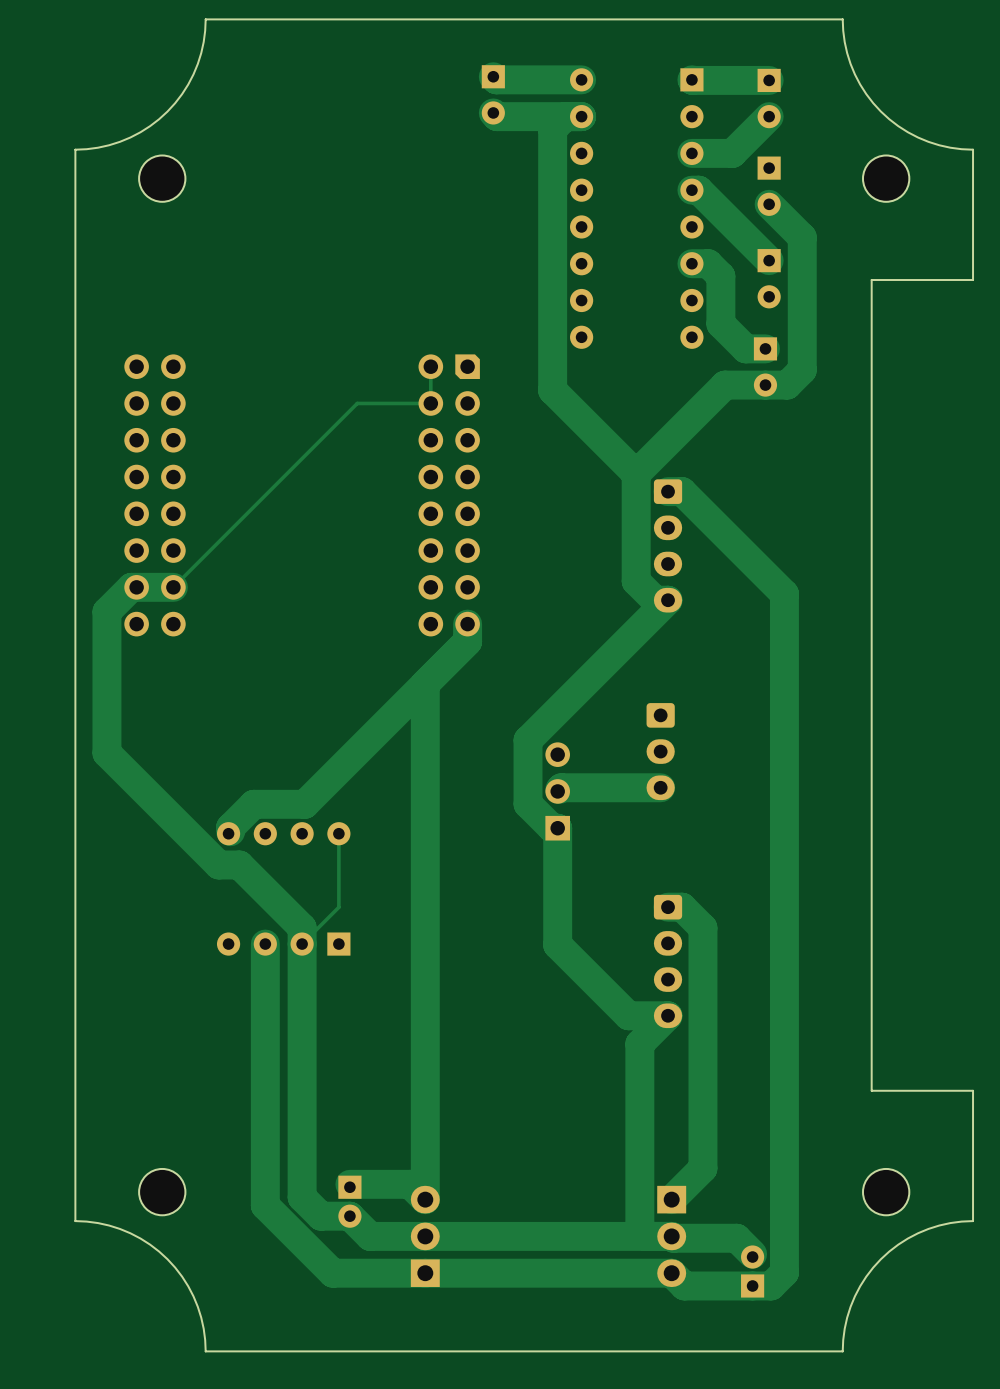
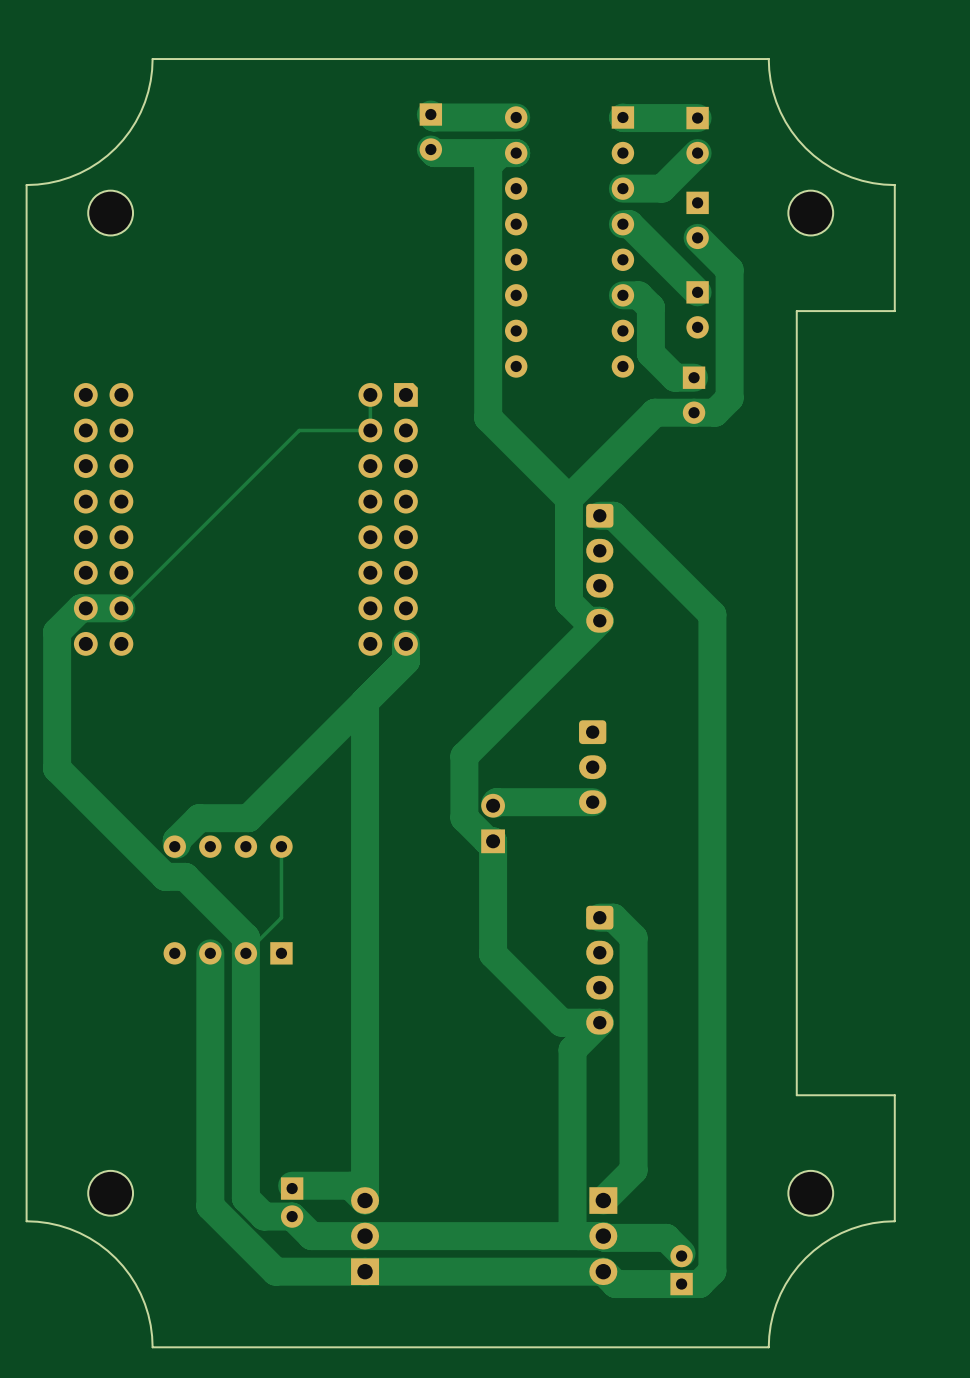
part: (557, 791) -> none

